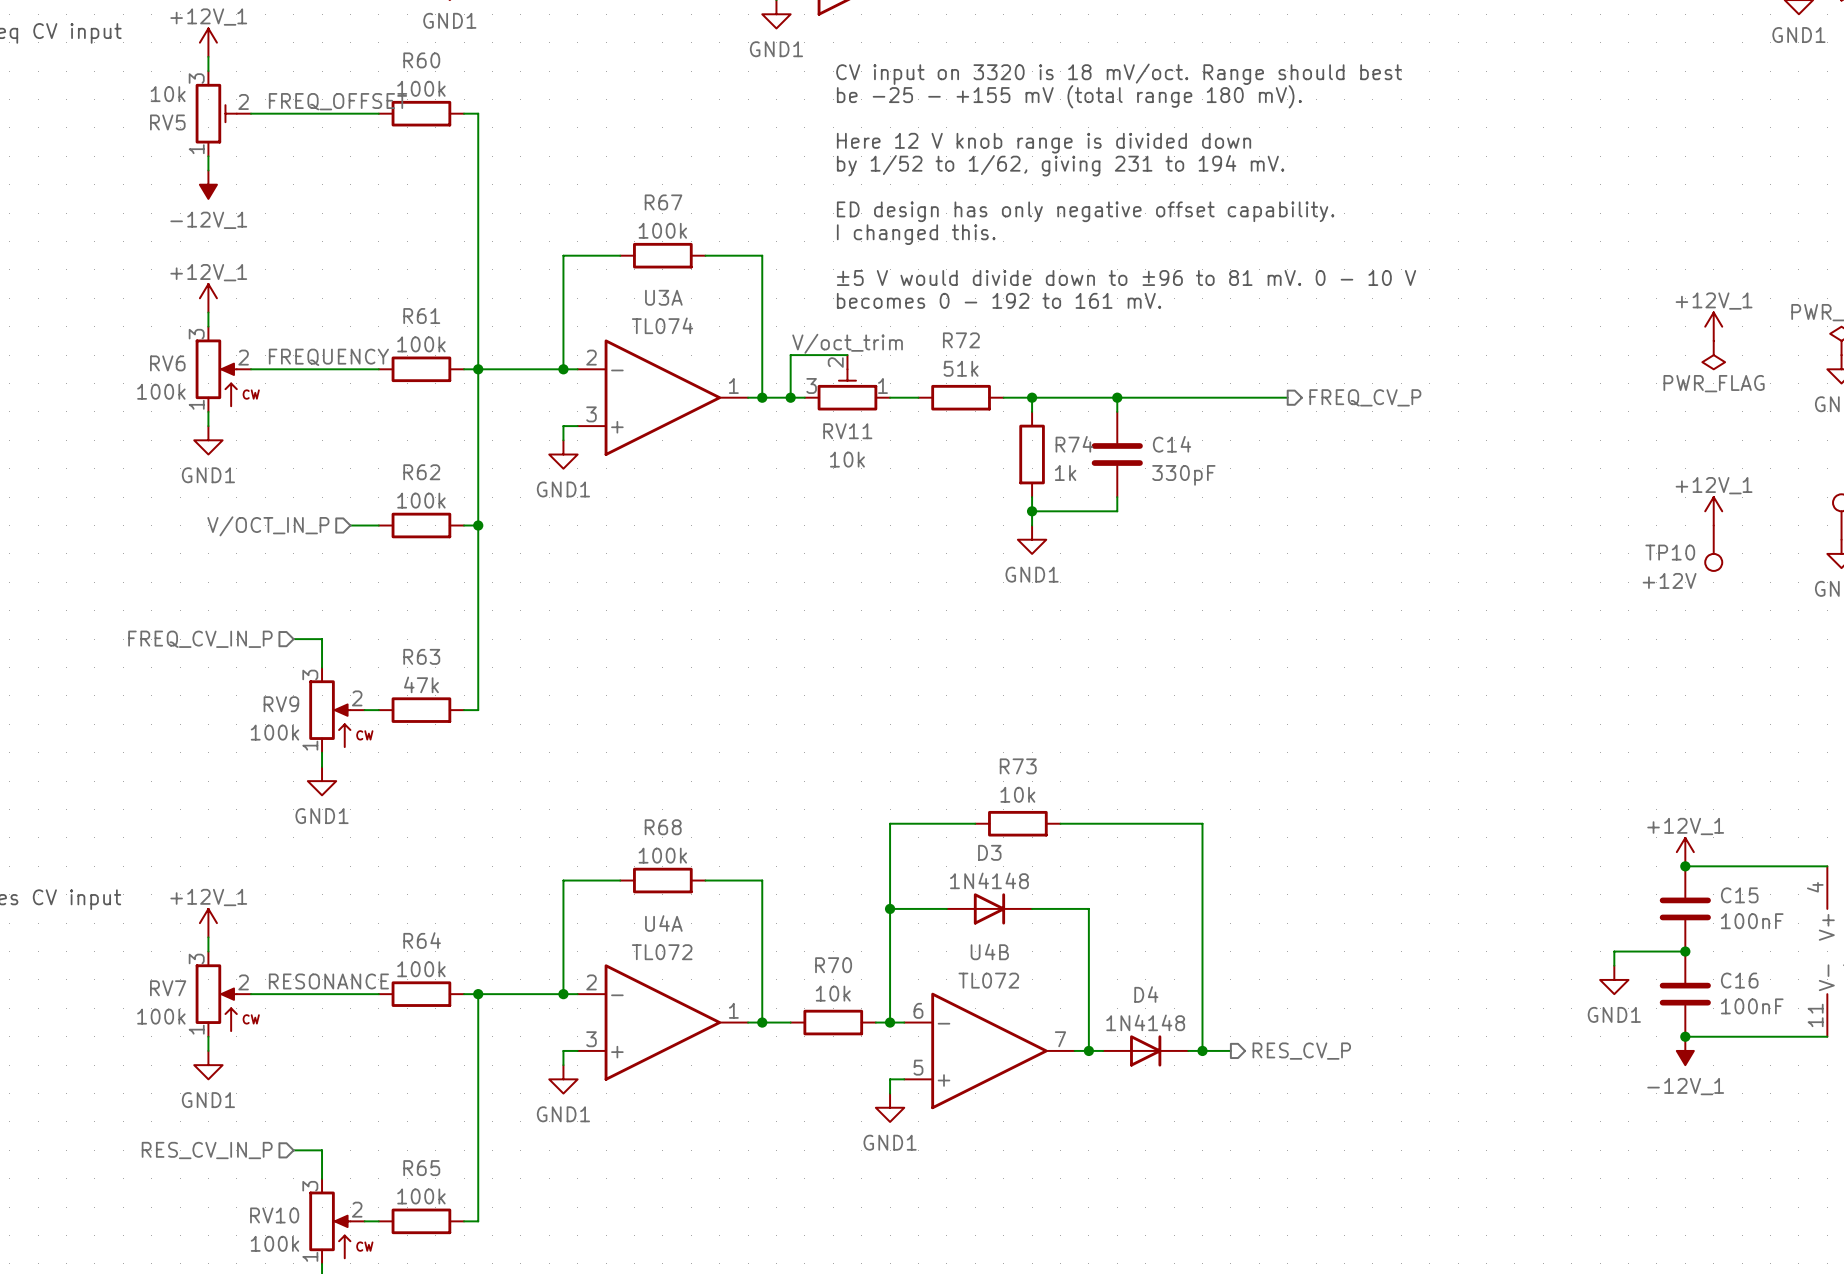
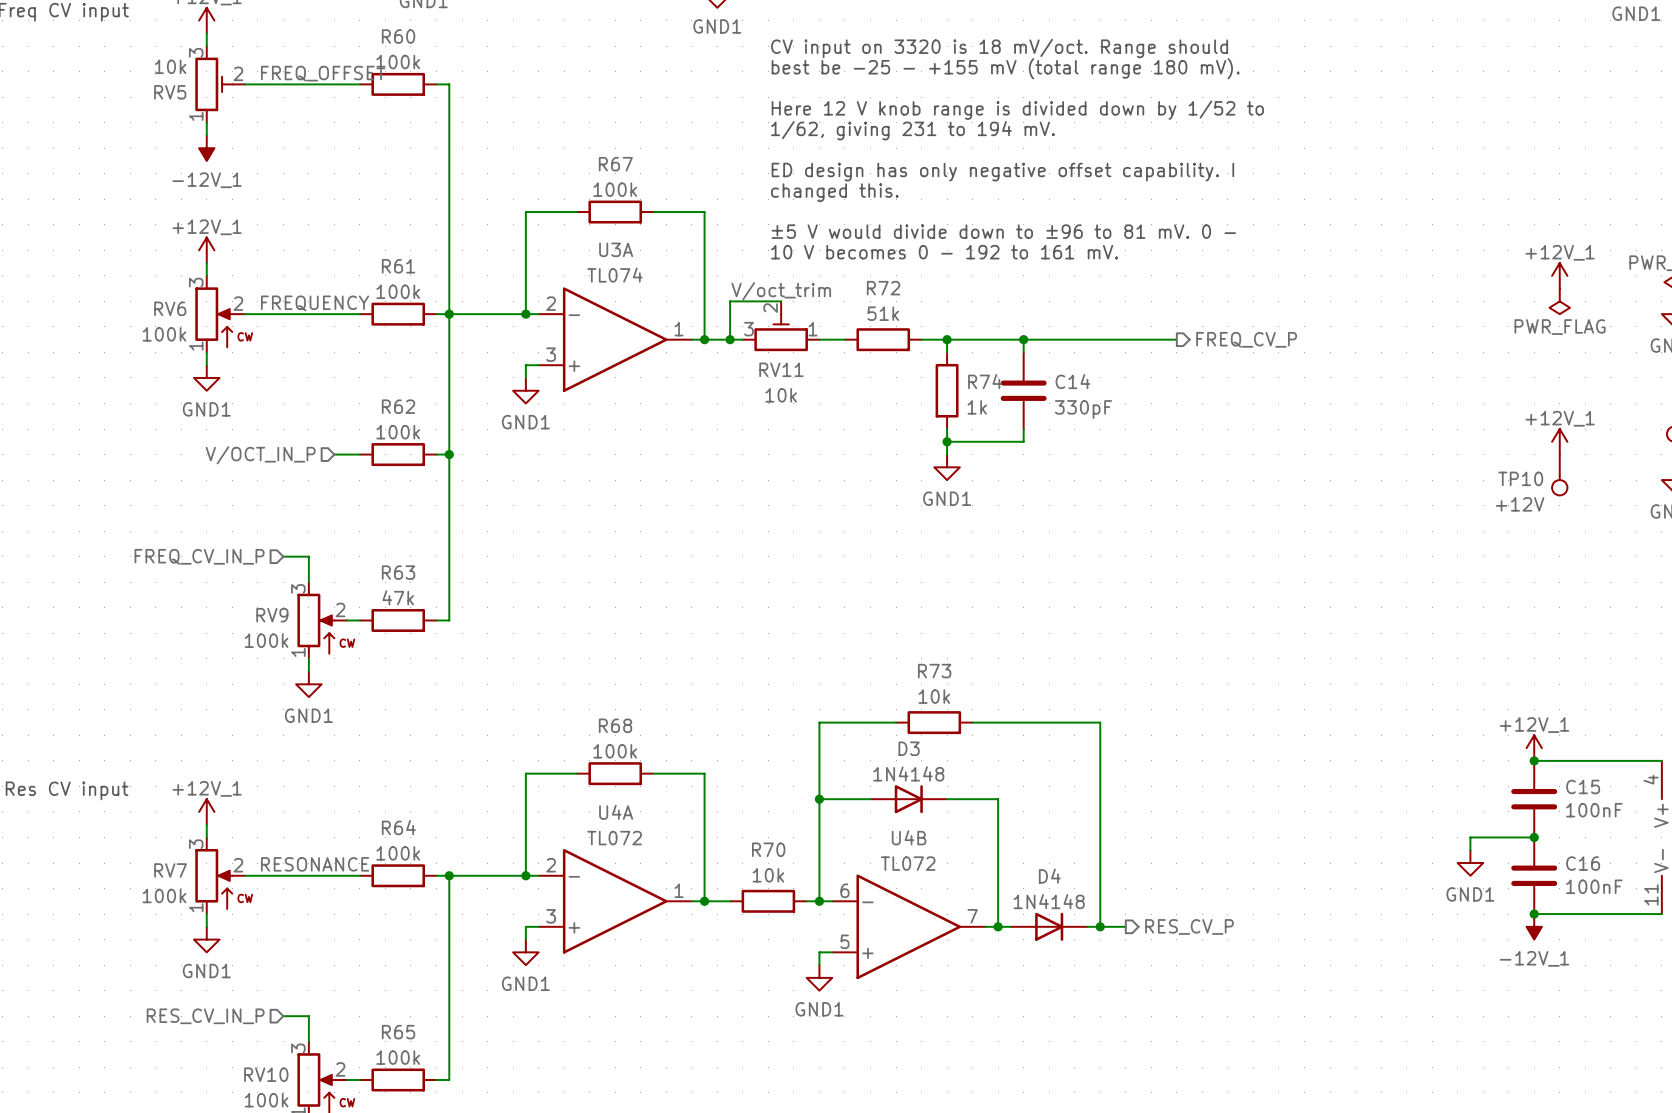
text: none -> CV input on 3320 is 18 mV/oct. Range should (999, 48)
text: CV input on 3320 is 18 mV/oct. Range should best (1119, 74) -> best be -25 - +155 mV (total range 180 mV). (1005, 68)
text: be -25 - +155 mV (total range 180 mV). (1069, 96) -> none
text: none -> Here 12 V knob range is divided down by 1/52 to (1017, 110)
text: Here 12 V knob range is divided down (1044, 143) -> 1/62, giving 231 to 194 mV. (912, 130)
text: by 1/52 to 1/62, giving 231 to 194 mV. (1060, 165) -> none
text: ED design has only negative offset capability. (1085, 211) -> changed this. (834, 192)
text: none -> ED design has only negative offset capability. I (1002, 172)
text: I changed this. (916, 234) -> none
text: none -> ±5 V would divide down to ±96 to 81 mV. 0 - (1003, 231)
text: ±5 V would divide down to ±96 to 81 mV. 0 - 10 V (1126, 278) -> 10 V becomes 0 - 192 to 161 mV. (944, 252)
text: becomes 0 - 192 to 161 mV. (999, 300) -> none

